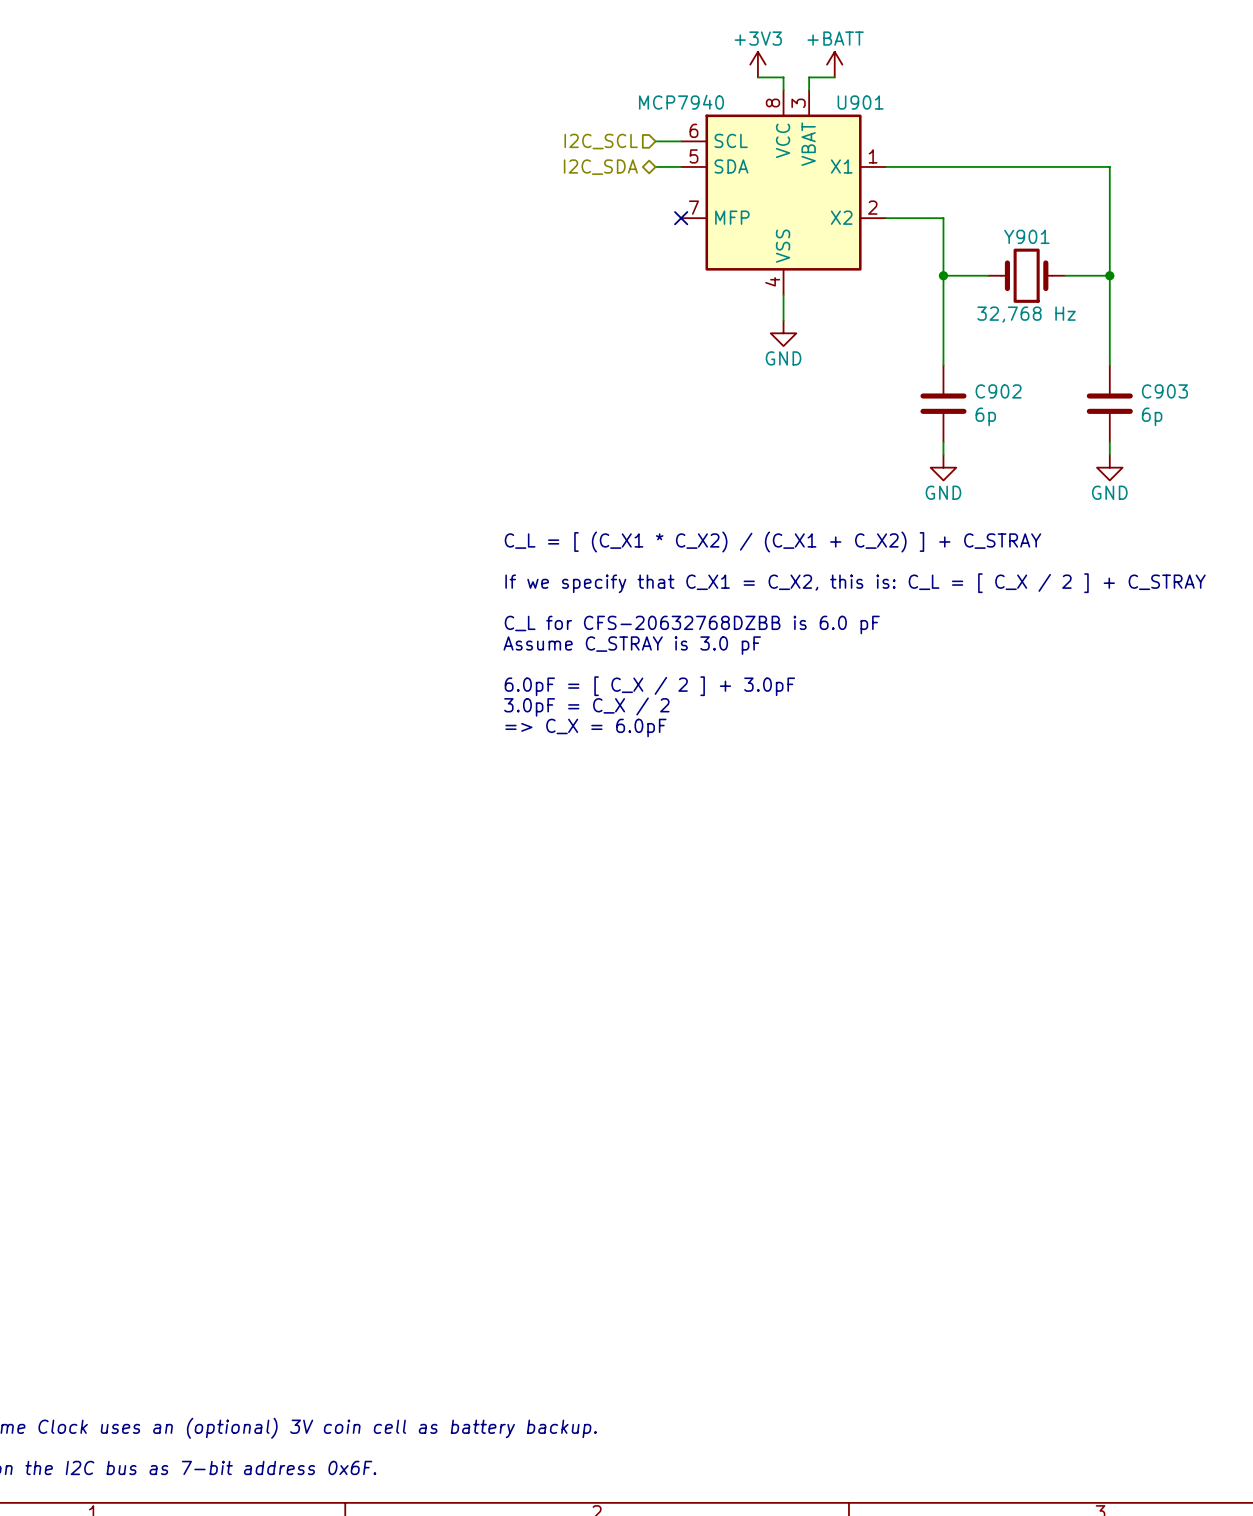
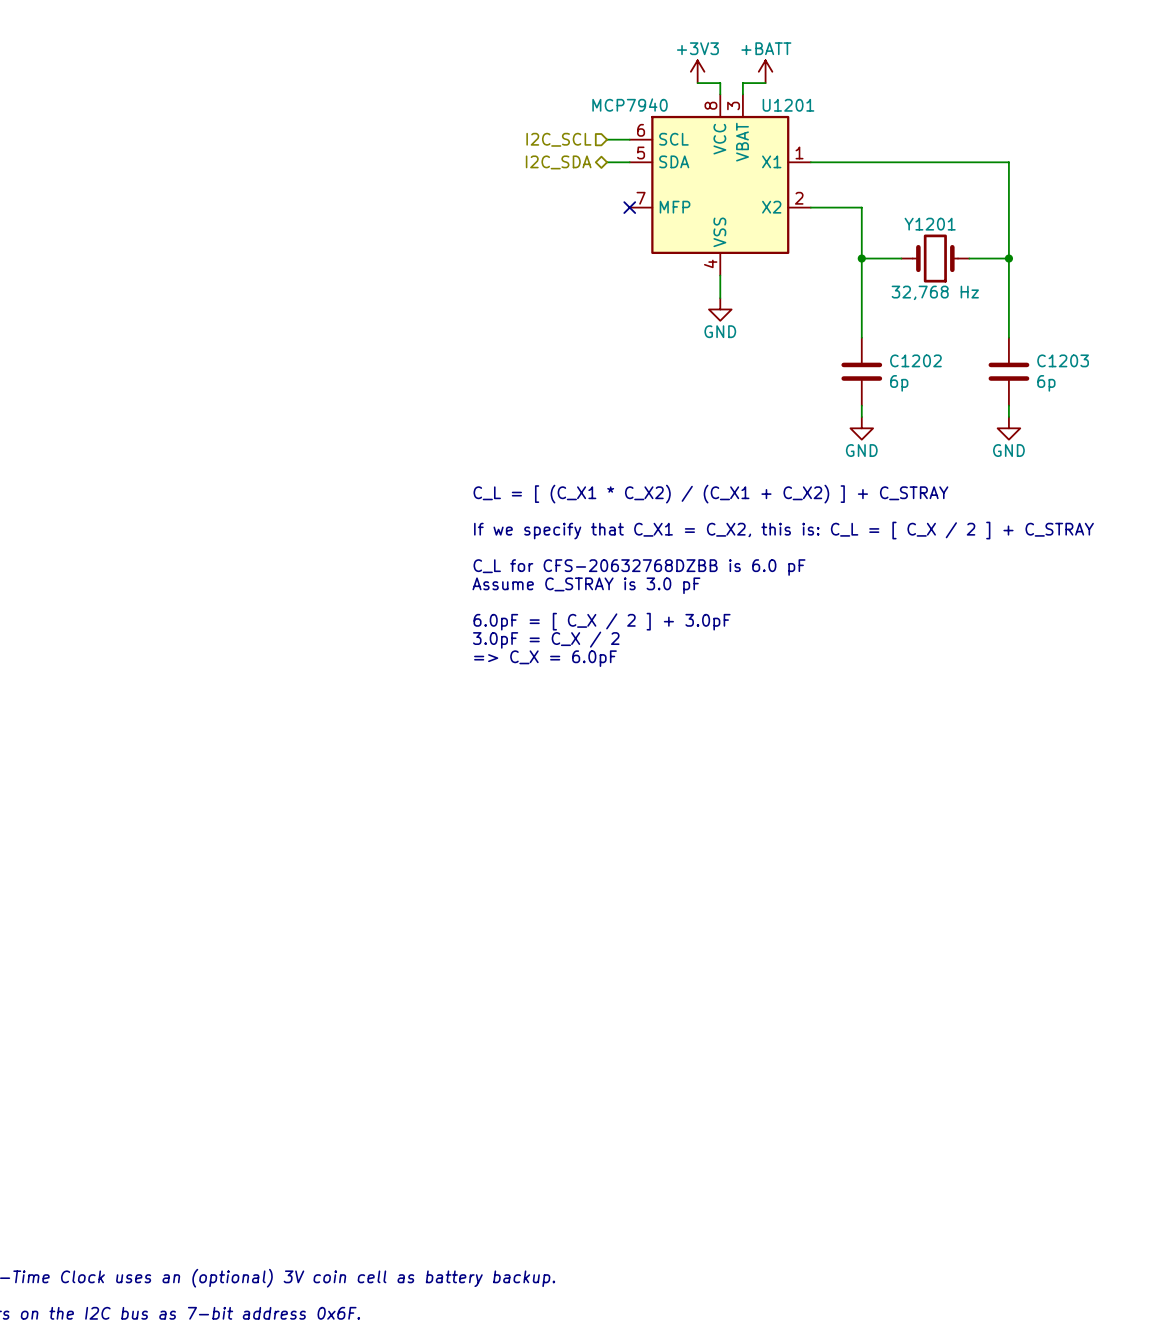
U901 name: U901 (860, 102) -> U1201 (788, 105)
Y901 name: Y901 (1026, 236) -> Y1201 (930, 224)
C902 name: C902 (998, 391) -> C1202 (915, 360)
C903 name: C903 (1164, 391) -> C1203 (1063, 360)

